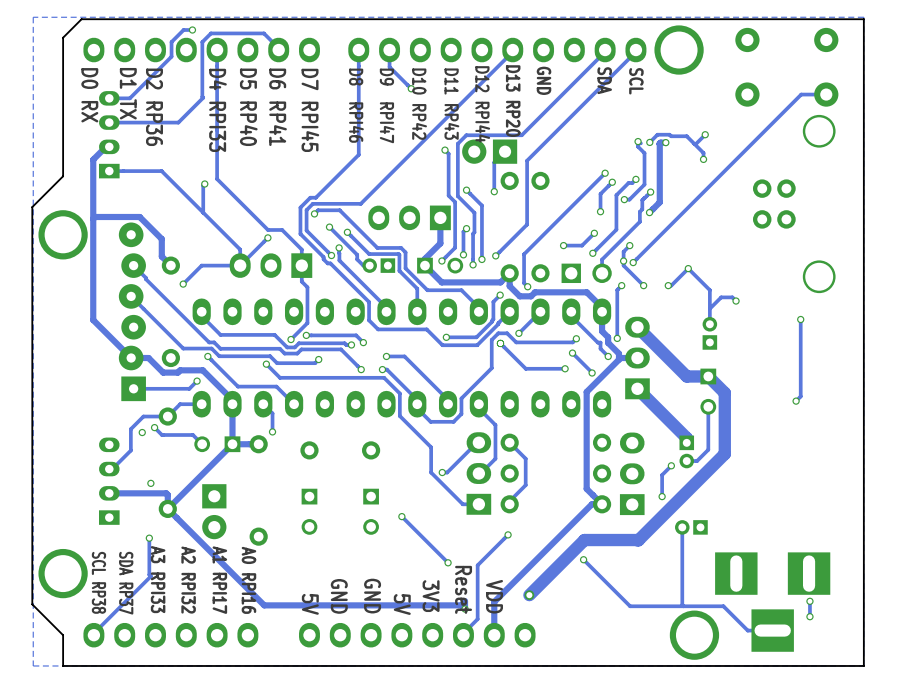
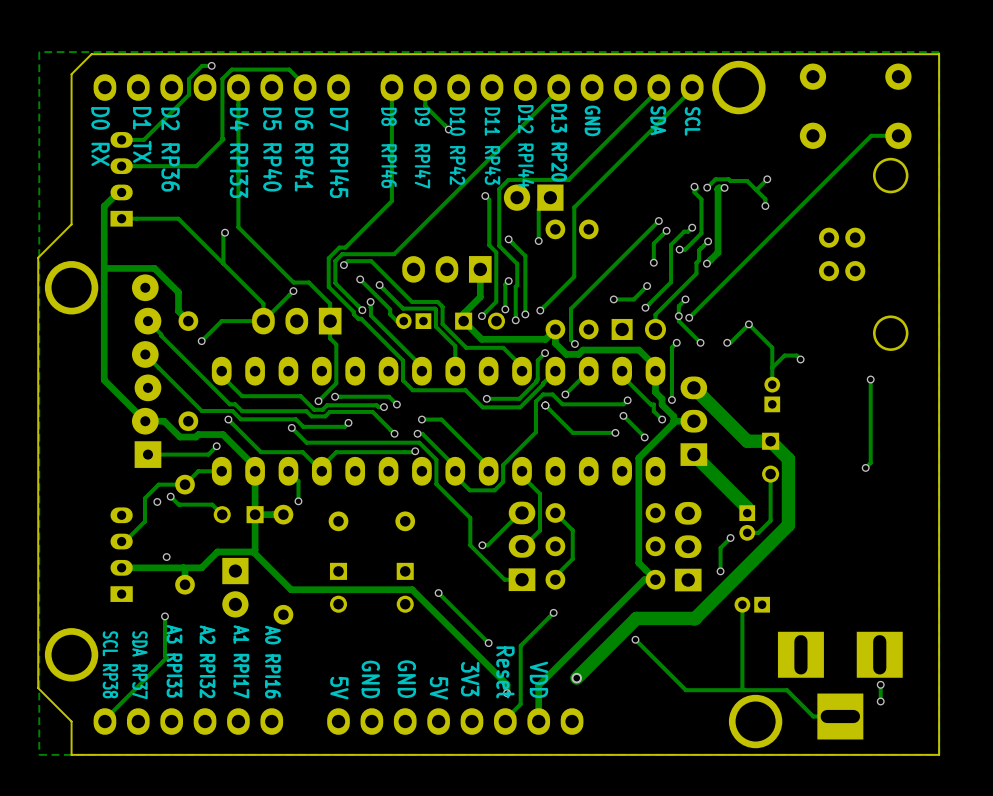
track: none -> (415, 451) (336, 452) (321, 466)
via: none -> (415, 451)
track: (232, 444) (167, 508) (264, 605) (461, 605) (465, 609) -> (255, 514) (255, 550) (253, 551)
track: none -> (253, 551) (291, 589) (412, 589) (507, 684)
track: none -> (253, 551) (217, 551) (201, 567) (183, 567)

